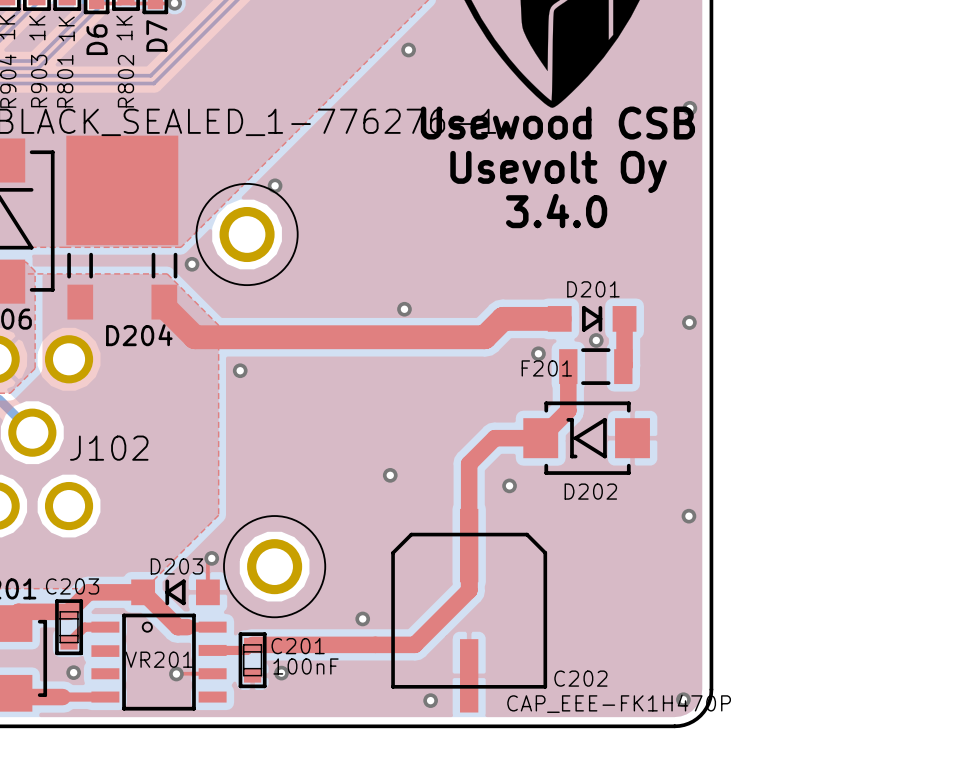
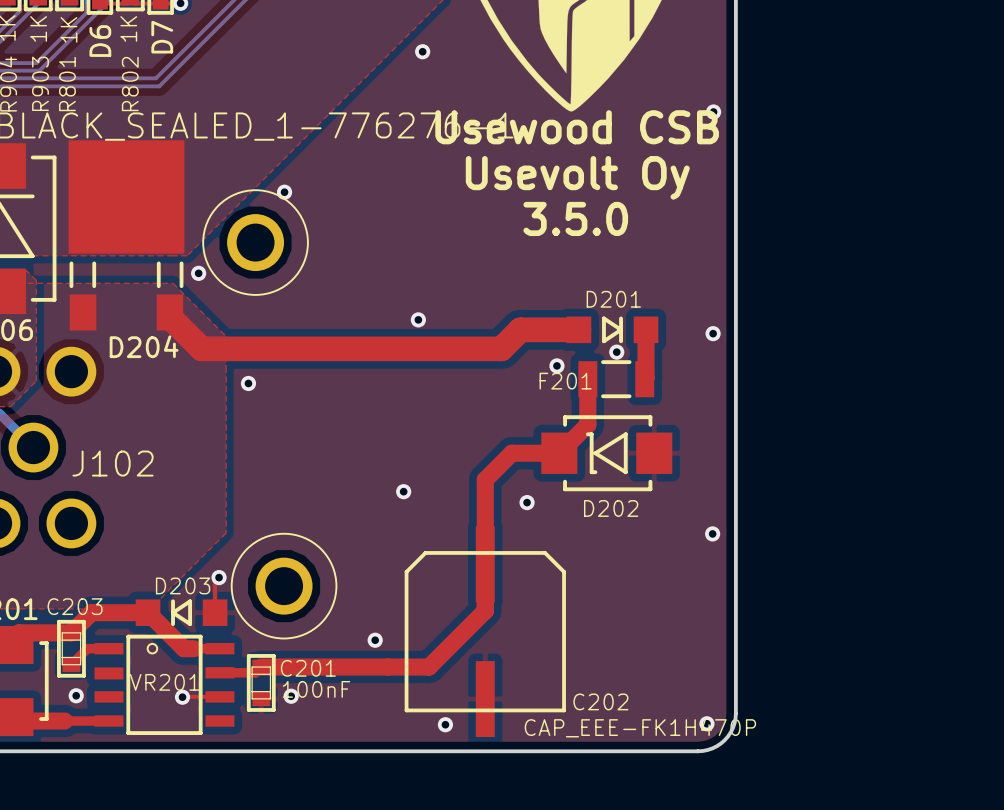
text: 3.4.0 (556, 211) -> 3.5.0 (575, 218)

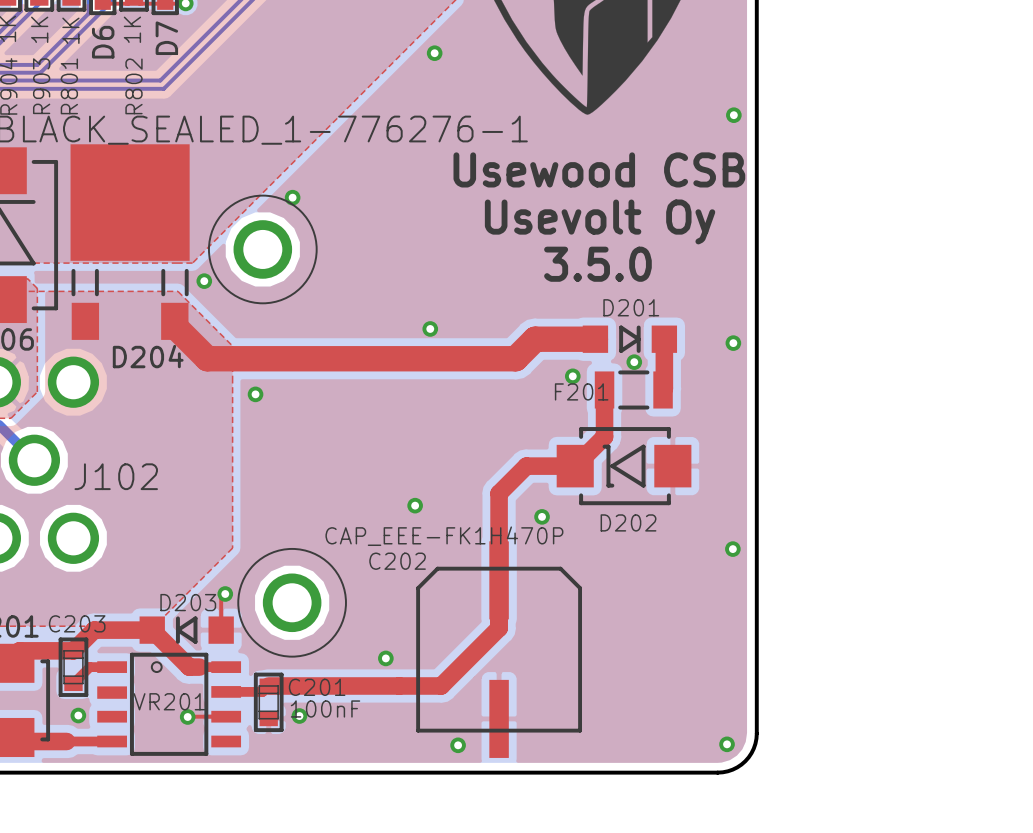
text: Usewood CSB (577, 127) -> none
text: Usevolt Oy (577, 177) -> Usewood CSB (599, 169)
text: 3.5.0 (575, 218) -> Usevolt Oy (600, 221)
text: none -> 3.5.0 (597, 264)
C202 name position: C202 (600, 701) -> C202 (397, 561)
C202 value position: CAP_EEE-FK1H470P (640, 727) -> CAP_EEE-FK1H470P (444, 536)

